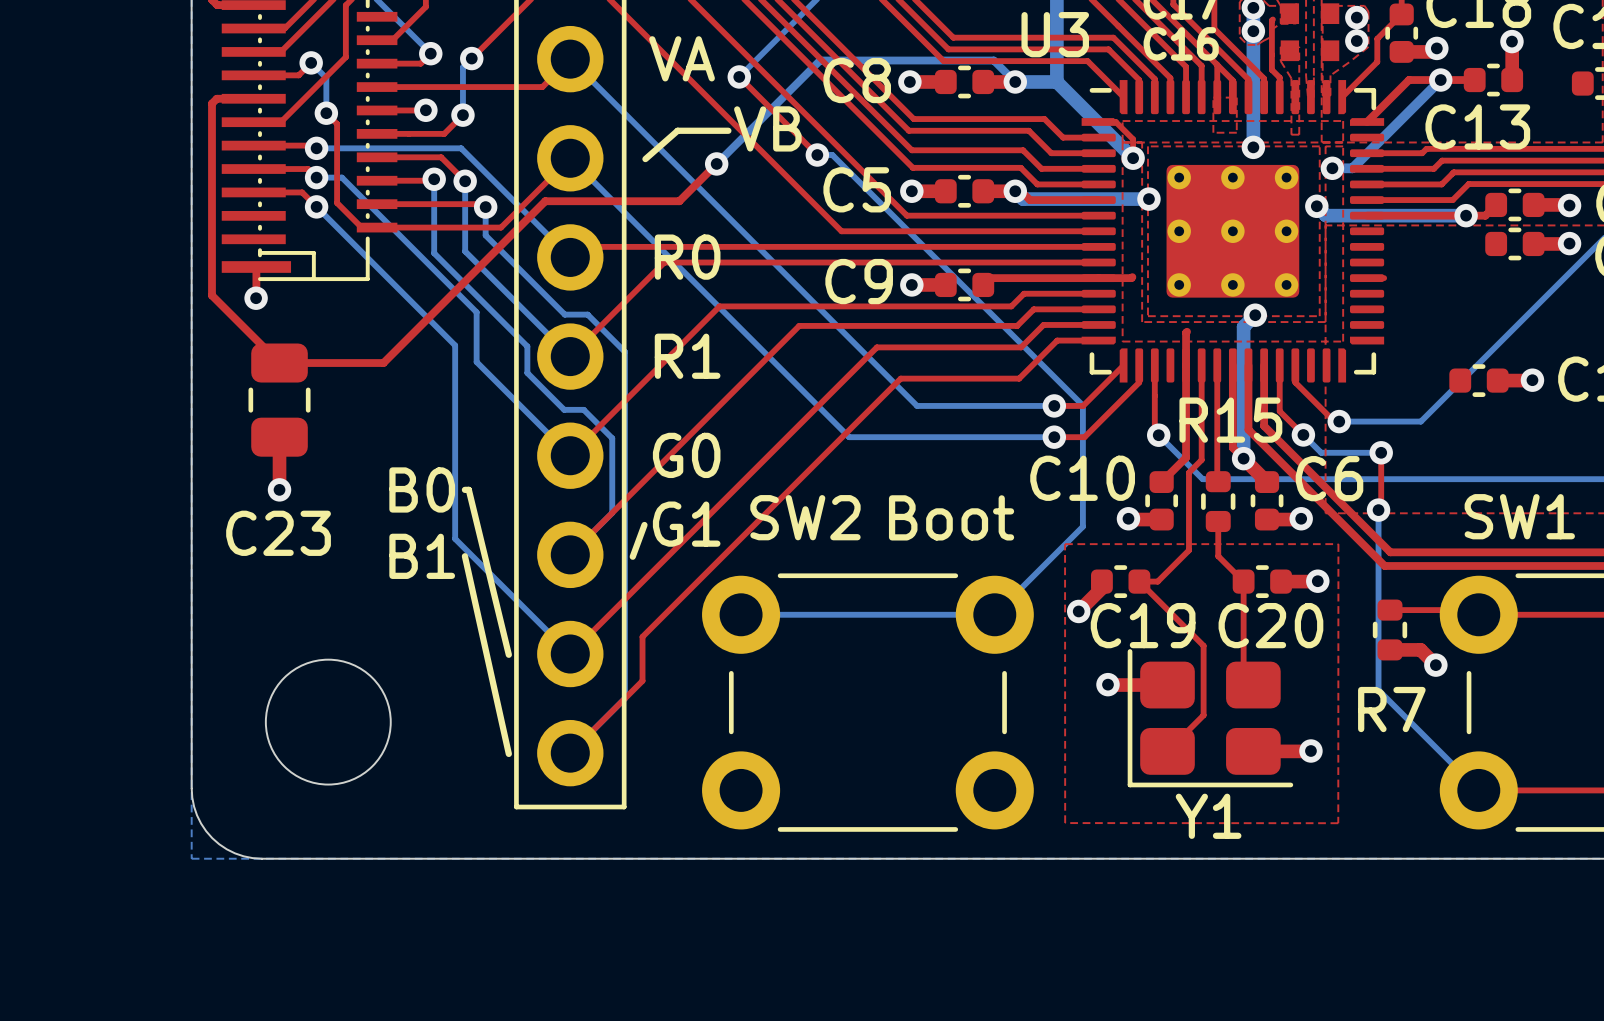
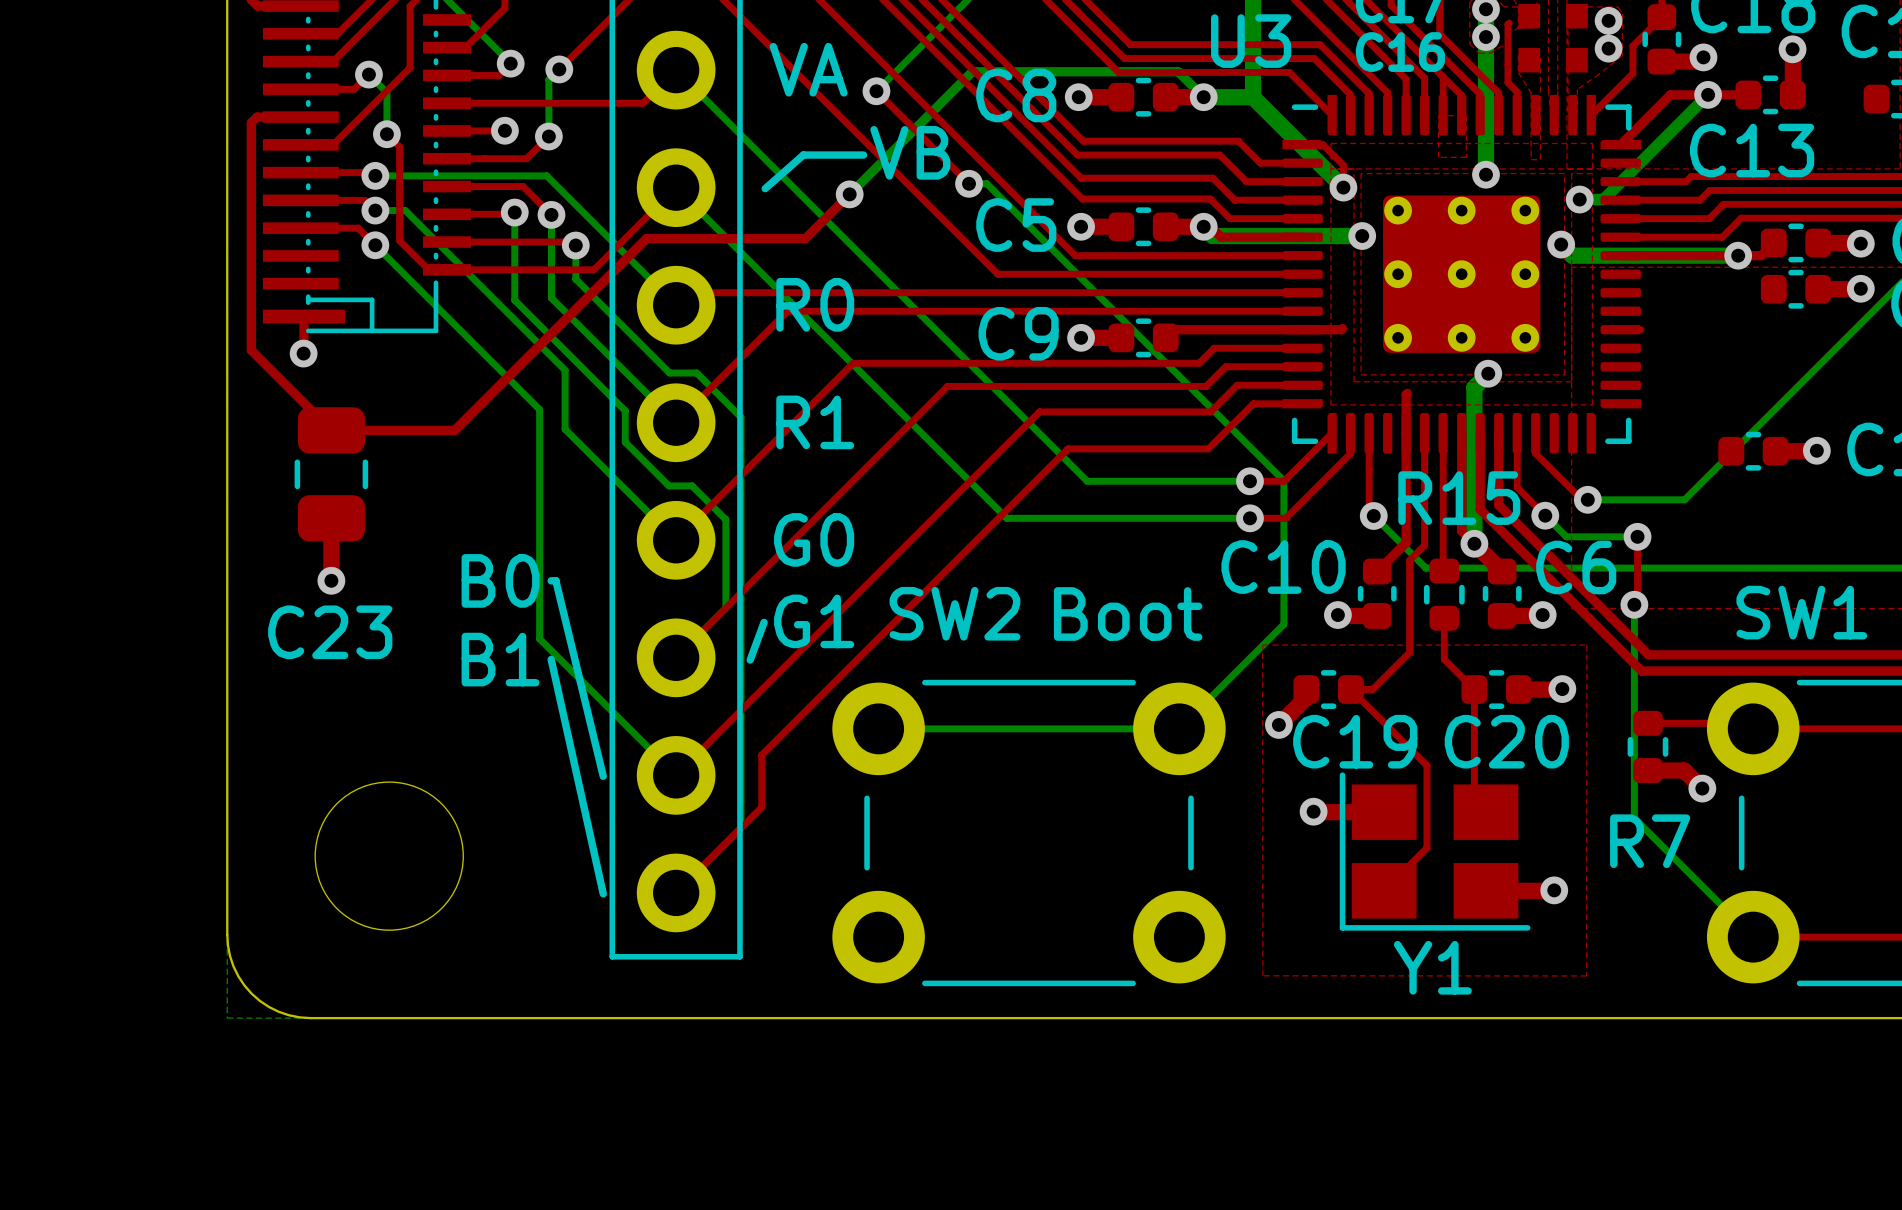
Y1 footprint: [1127, 649, 1294, 788] -> [1339, 772, 1531, 931]

